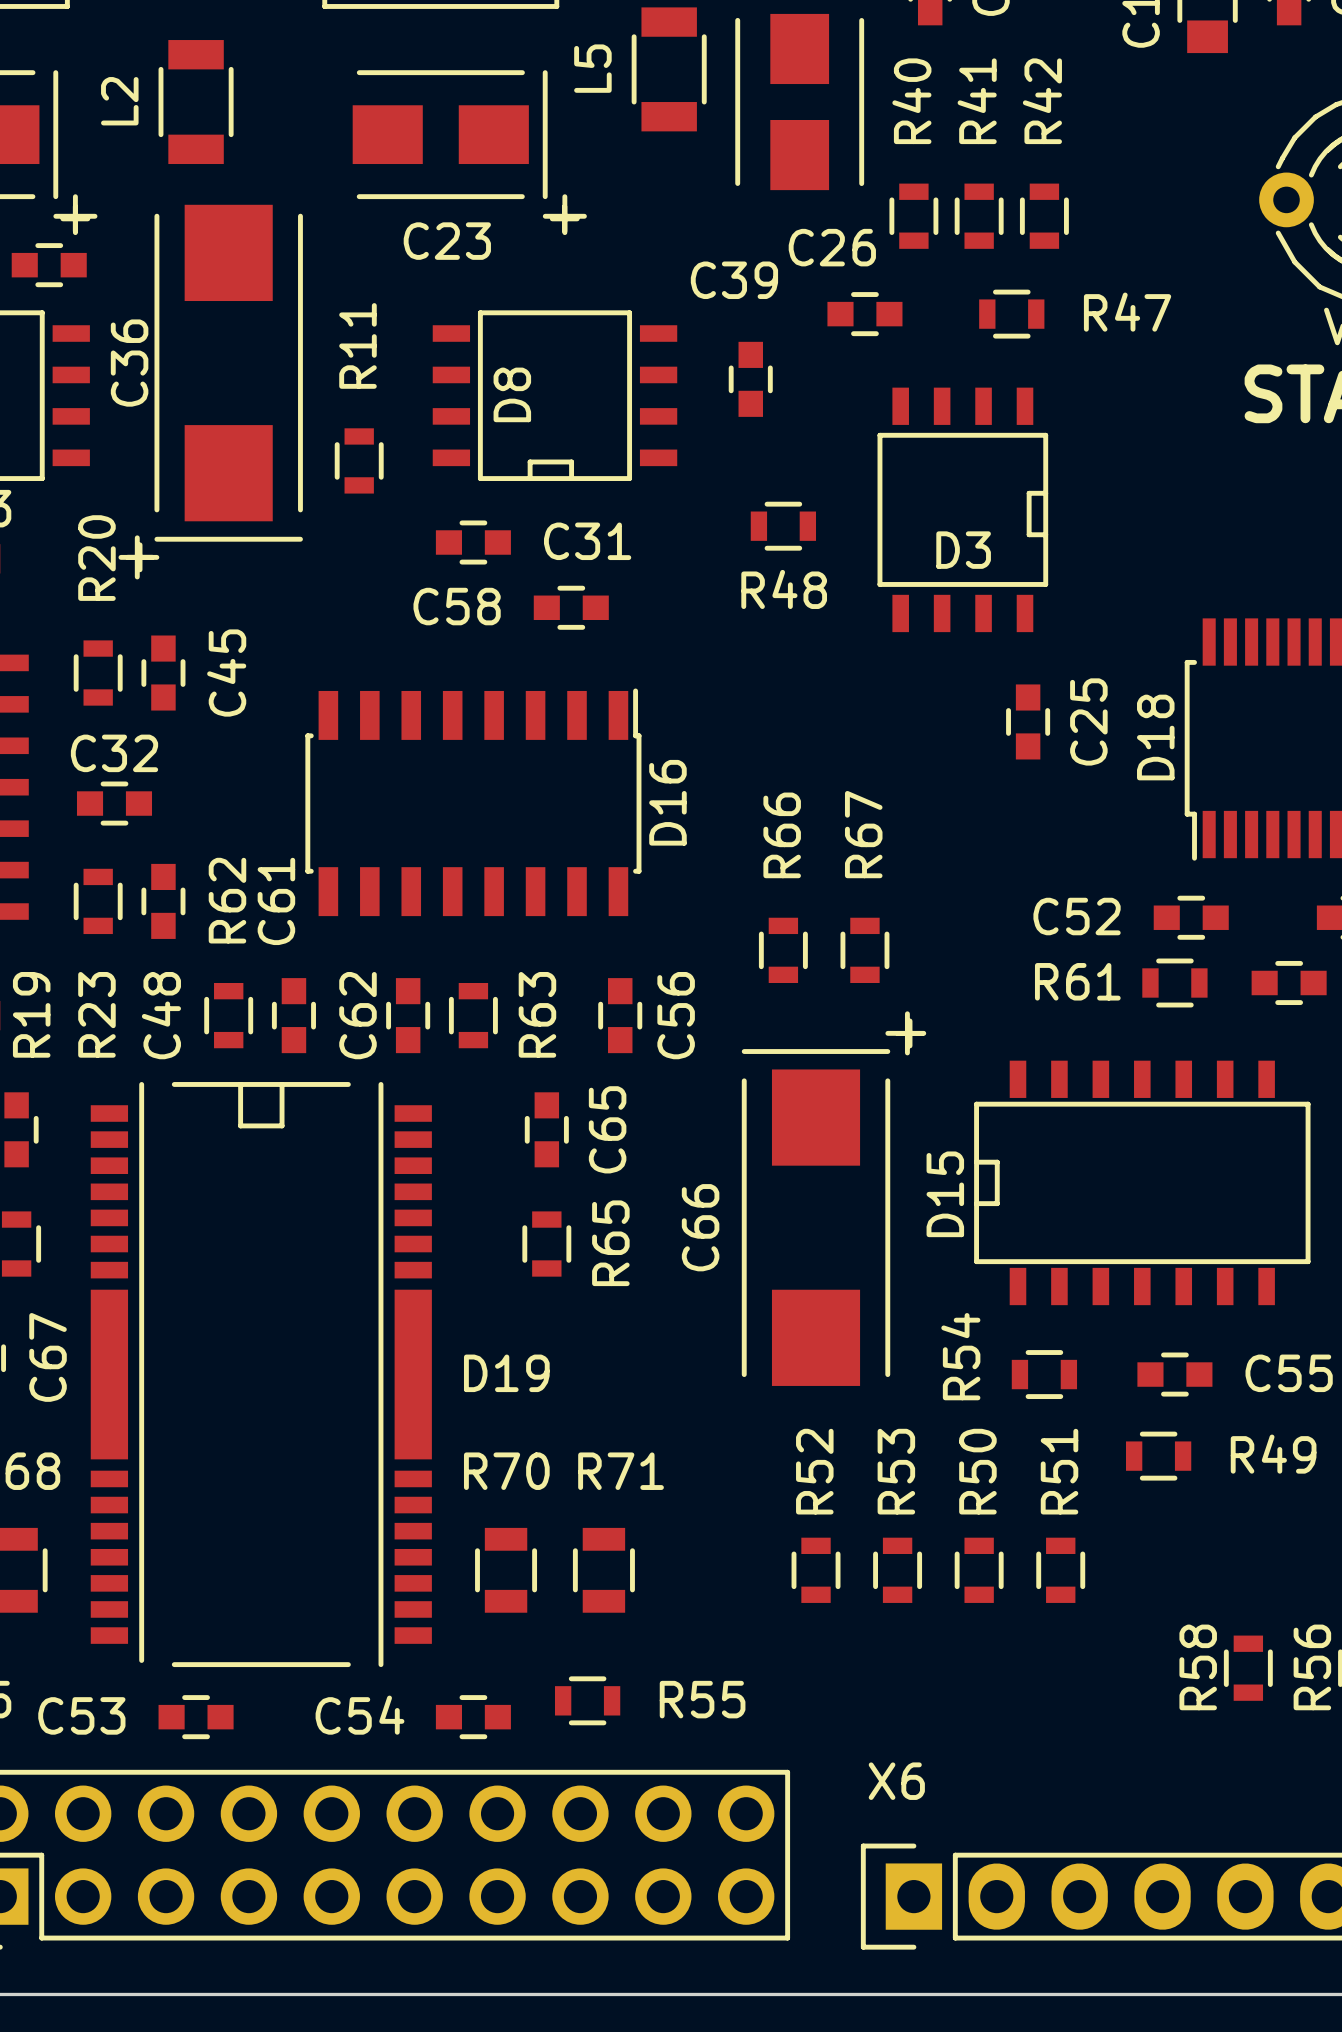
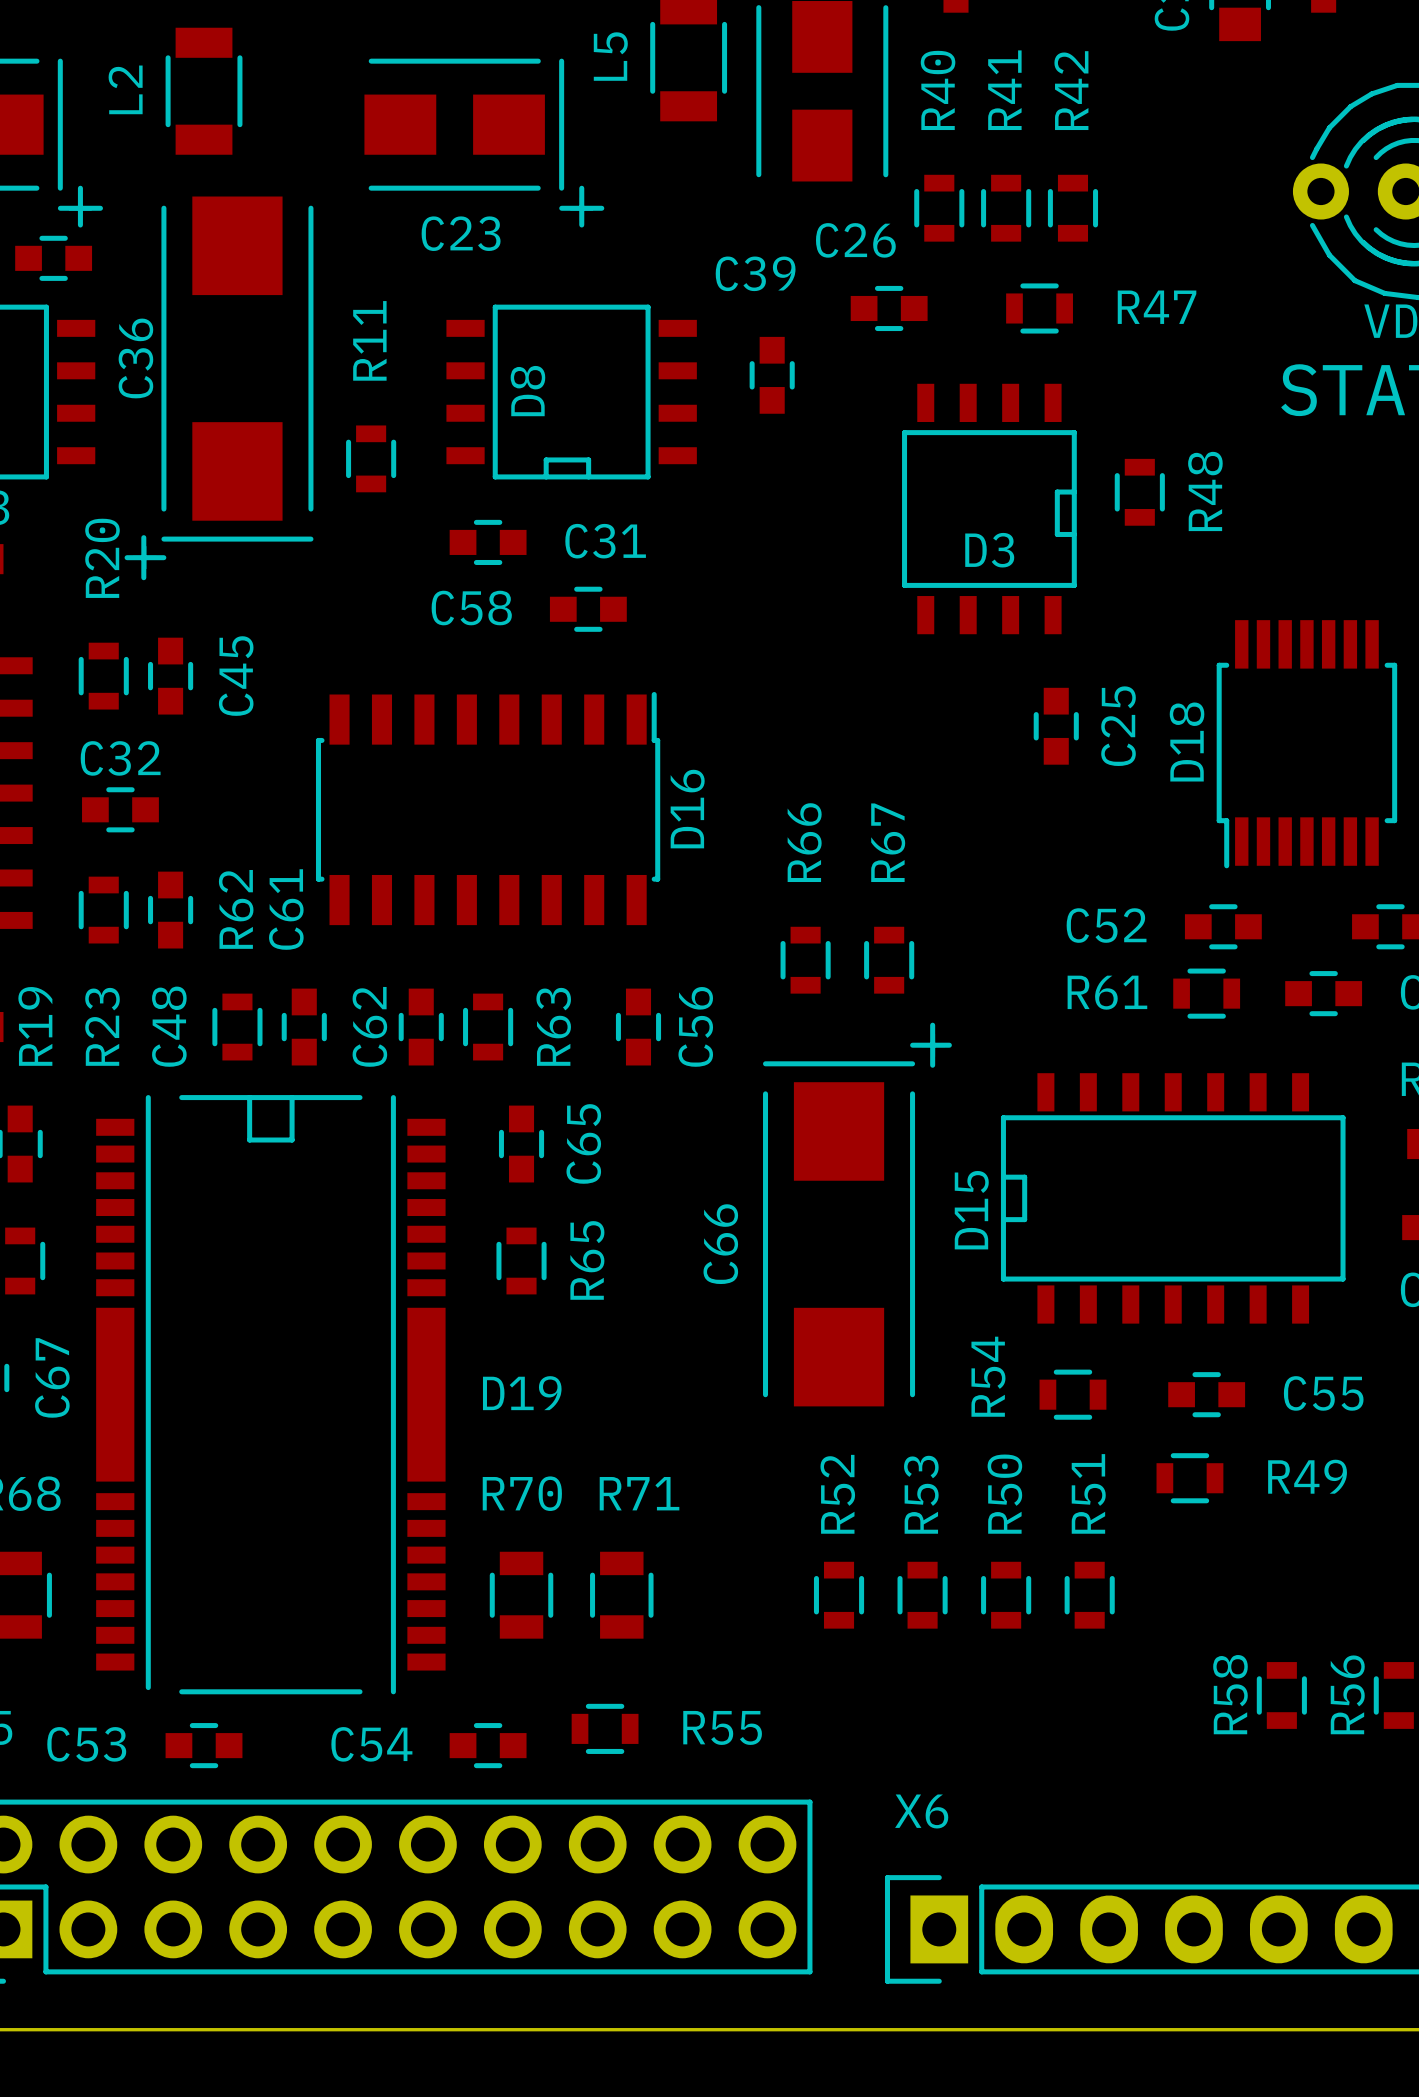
R48 rotation: 0° (783, 526) -> 90° clockwise (1139, 492)
R48 position: (783, 526) -> (1139, 492)
R48 name position: R48 (784, 589) -> R48 (1205, 491)
C65 position: (546, 1129) -> (521, 1144)
R65 position: (546, 1244) -> (521, 1260)

